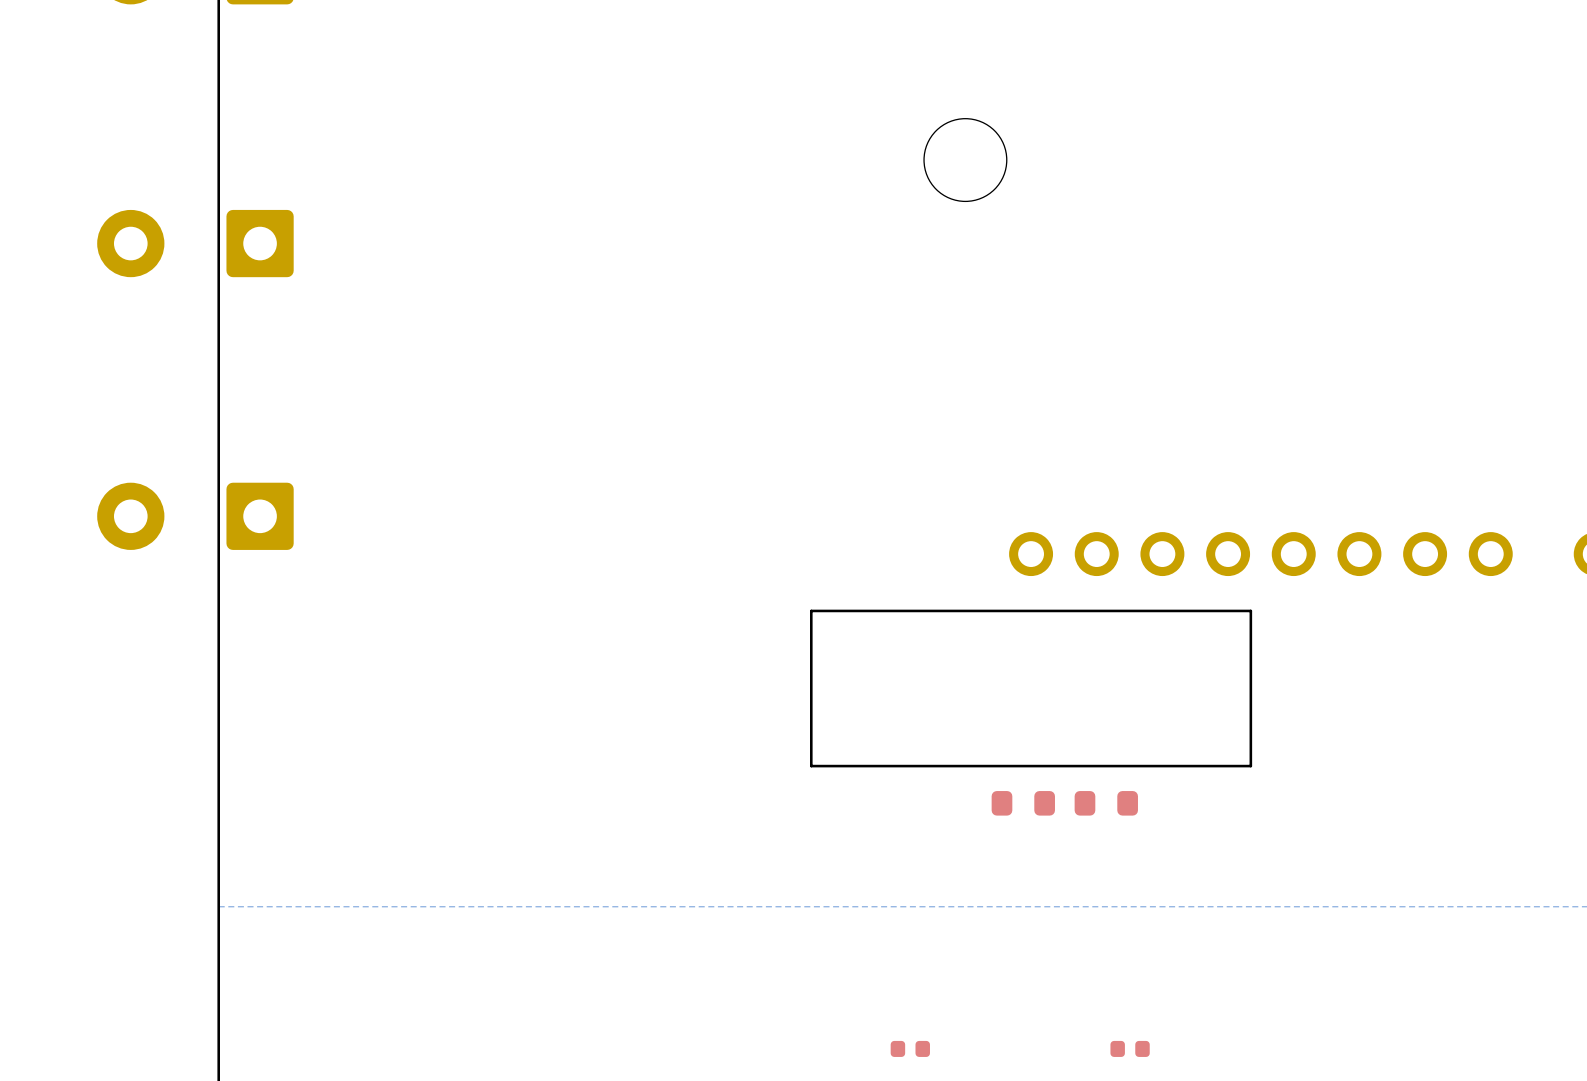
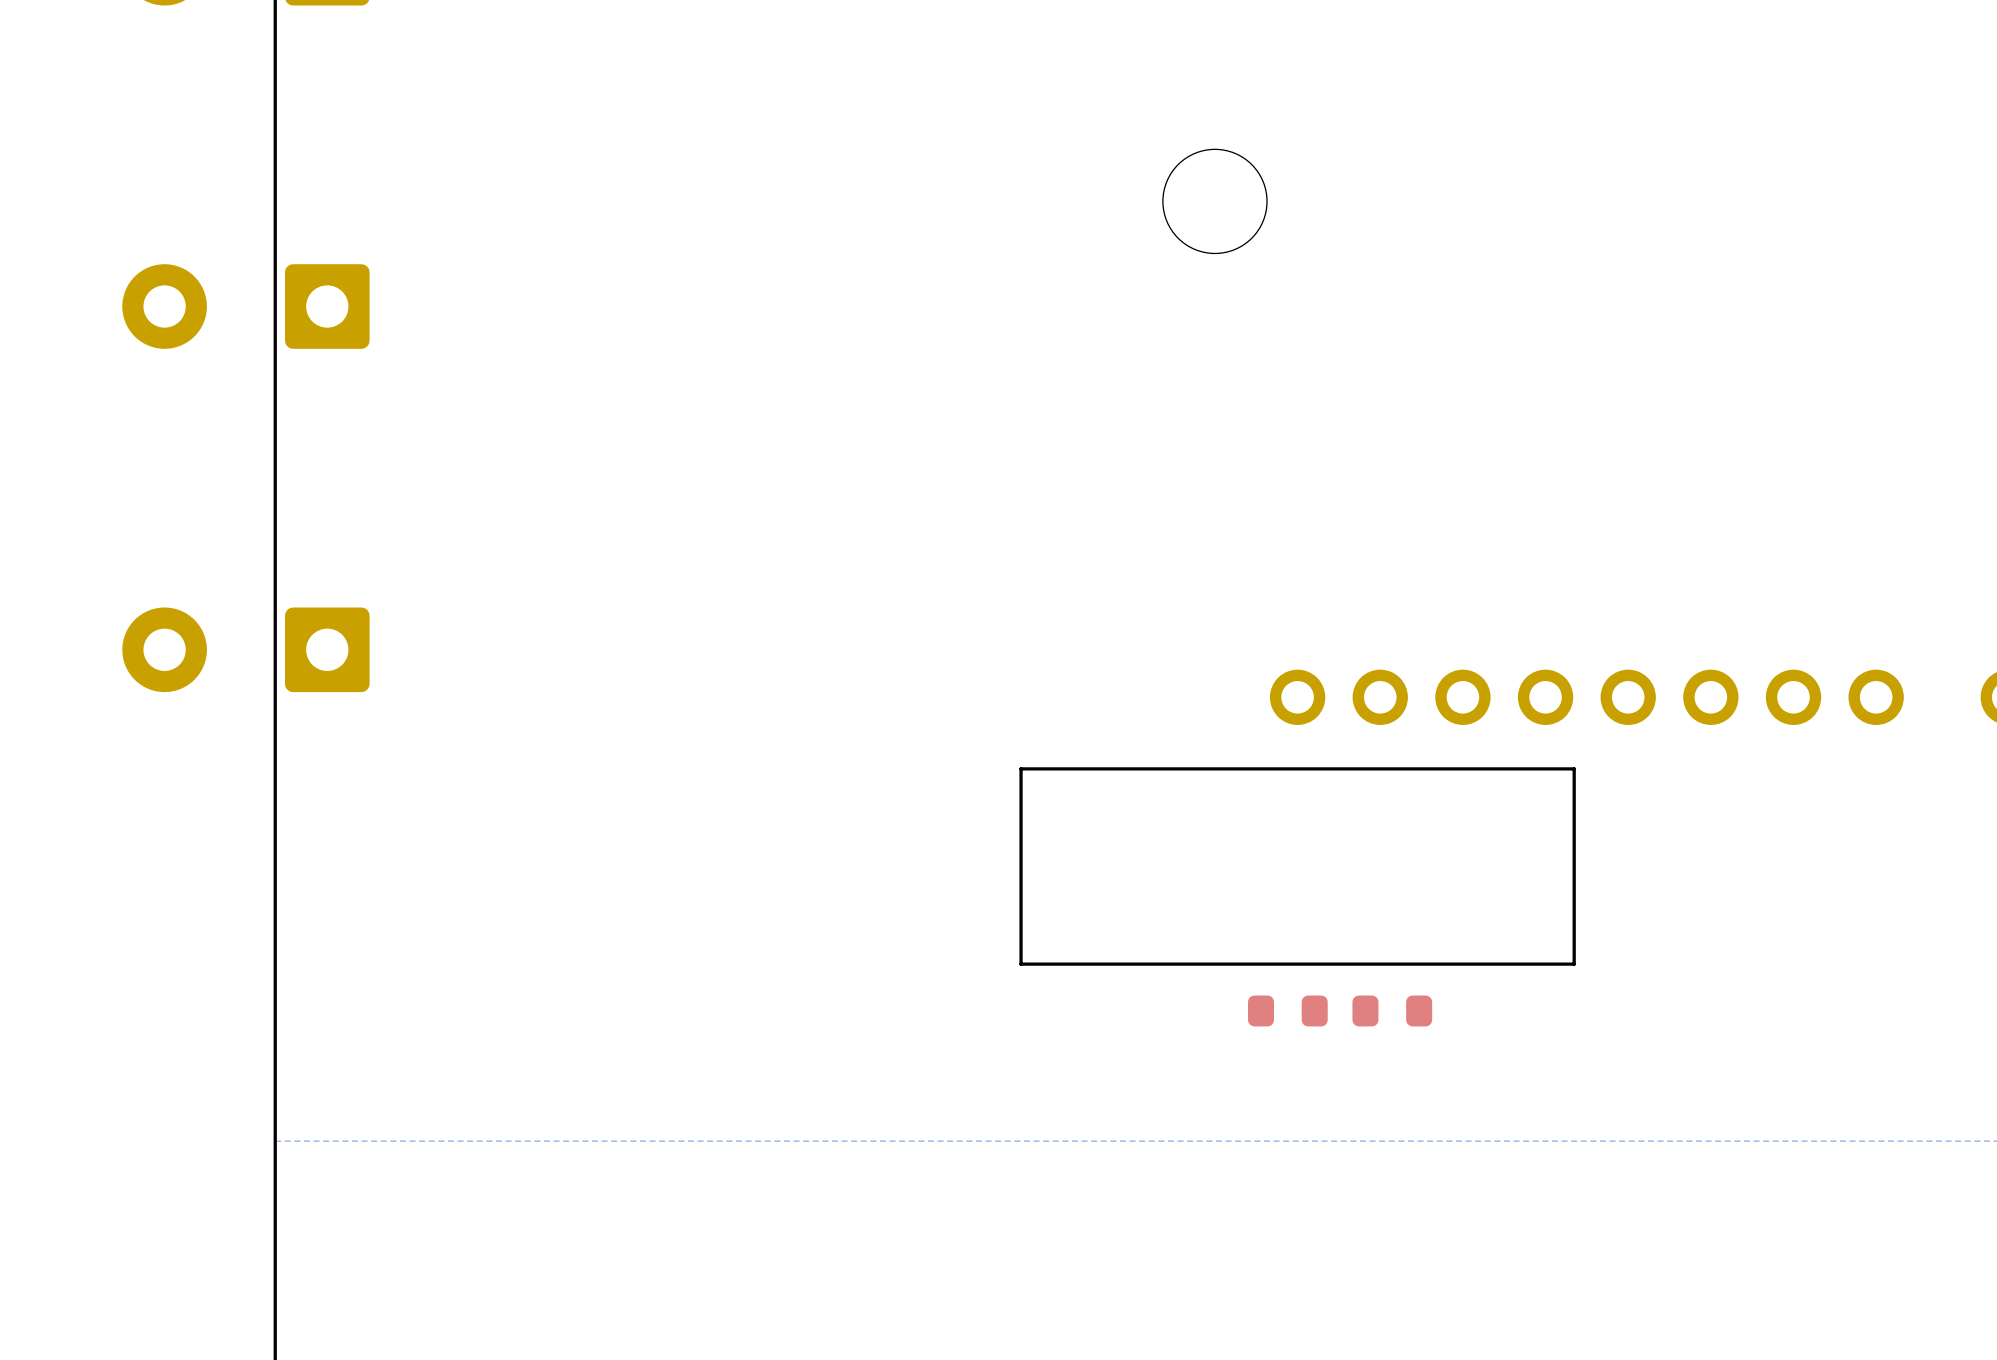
part: (910, 1048) -> none
part: (1130, 1048) -> none

